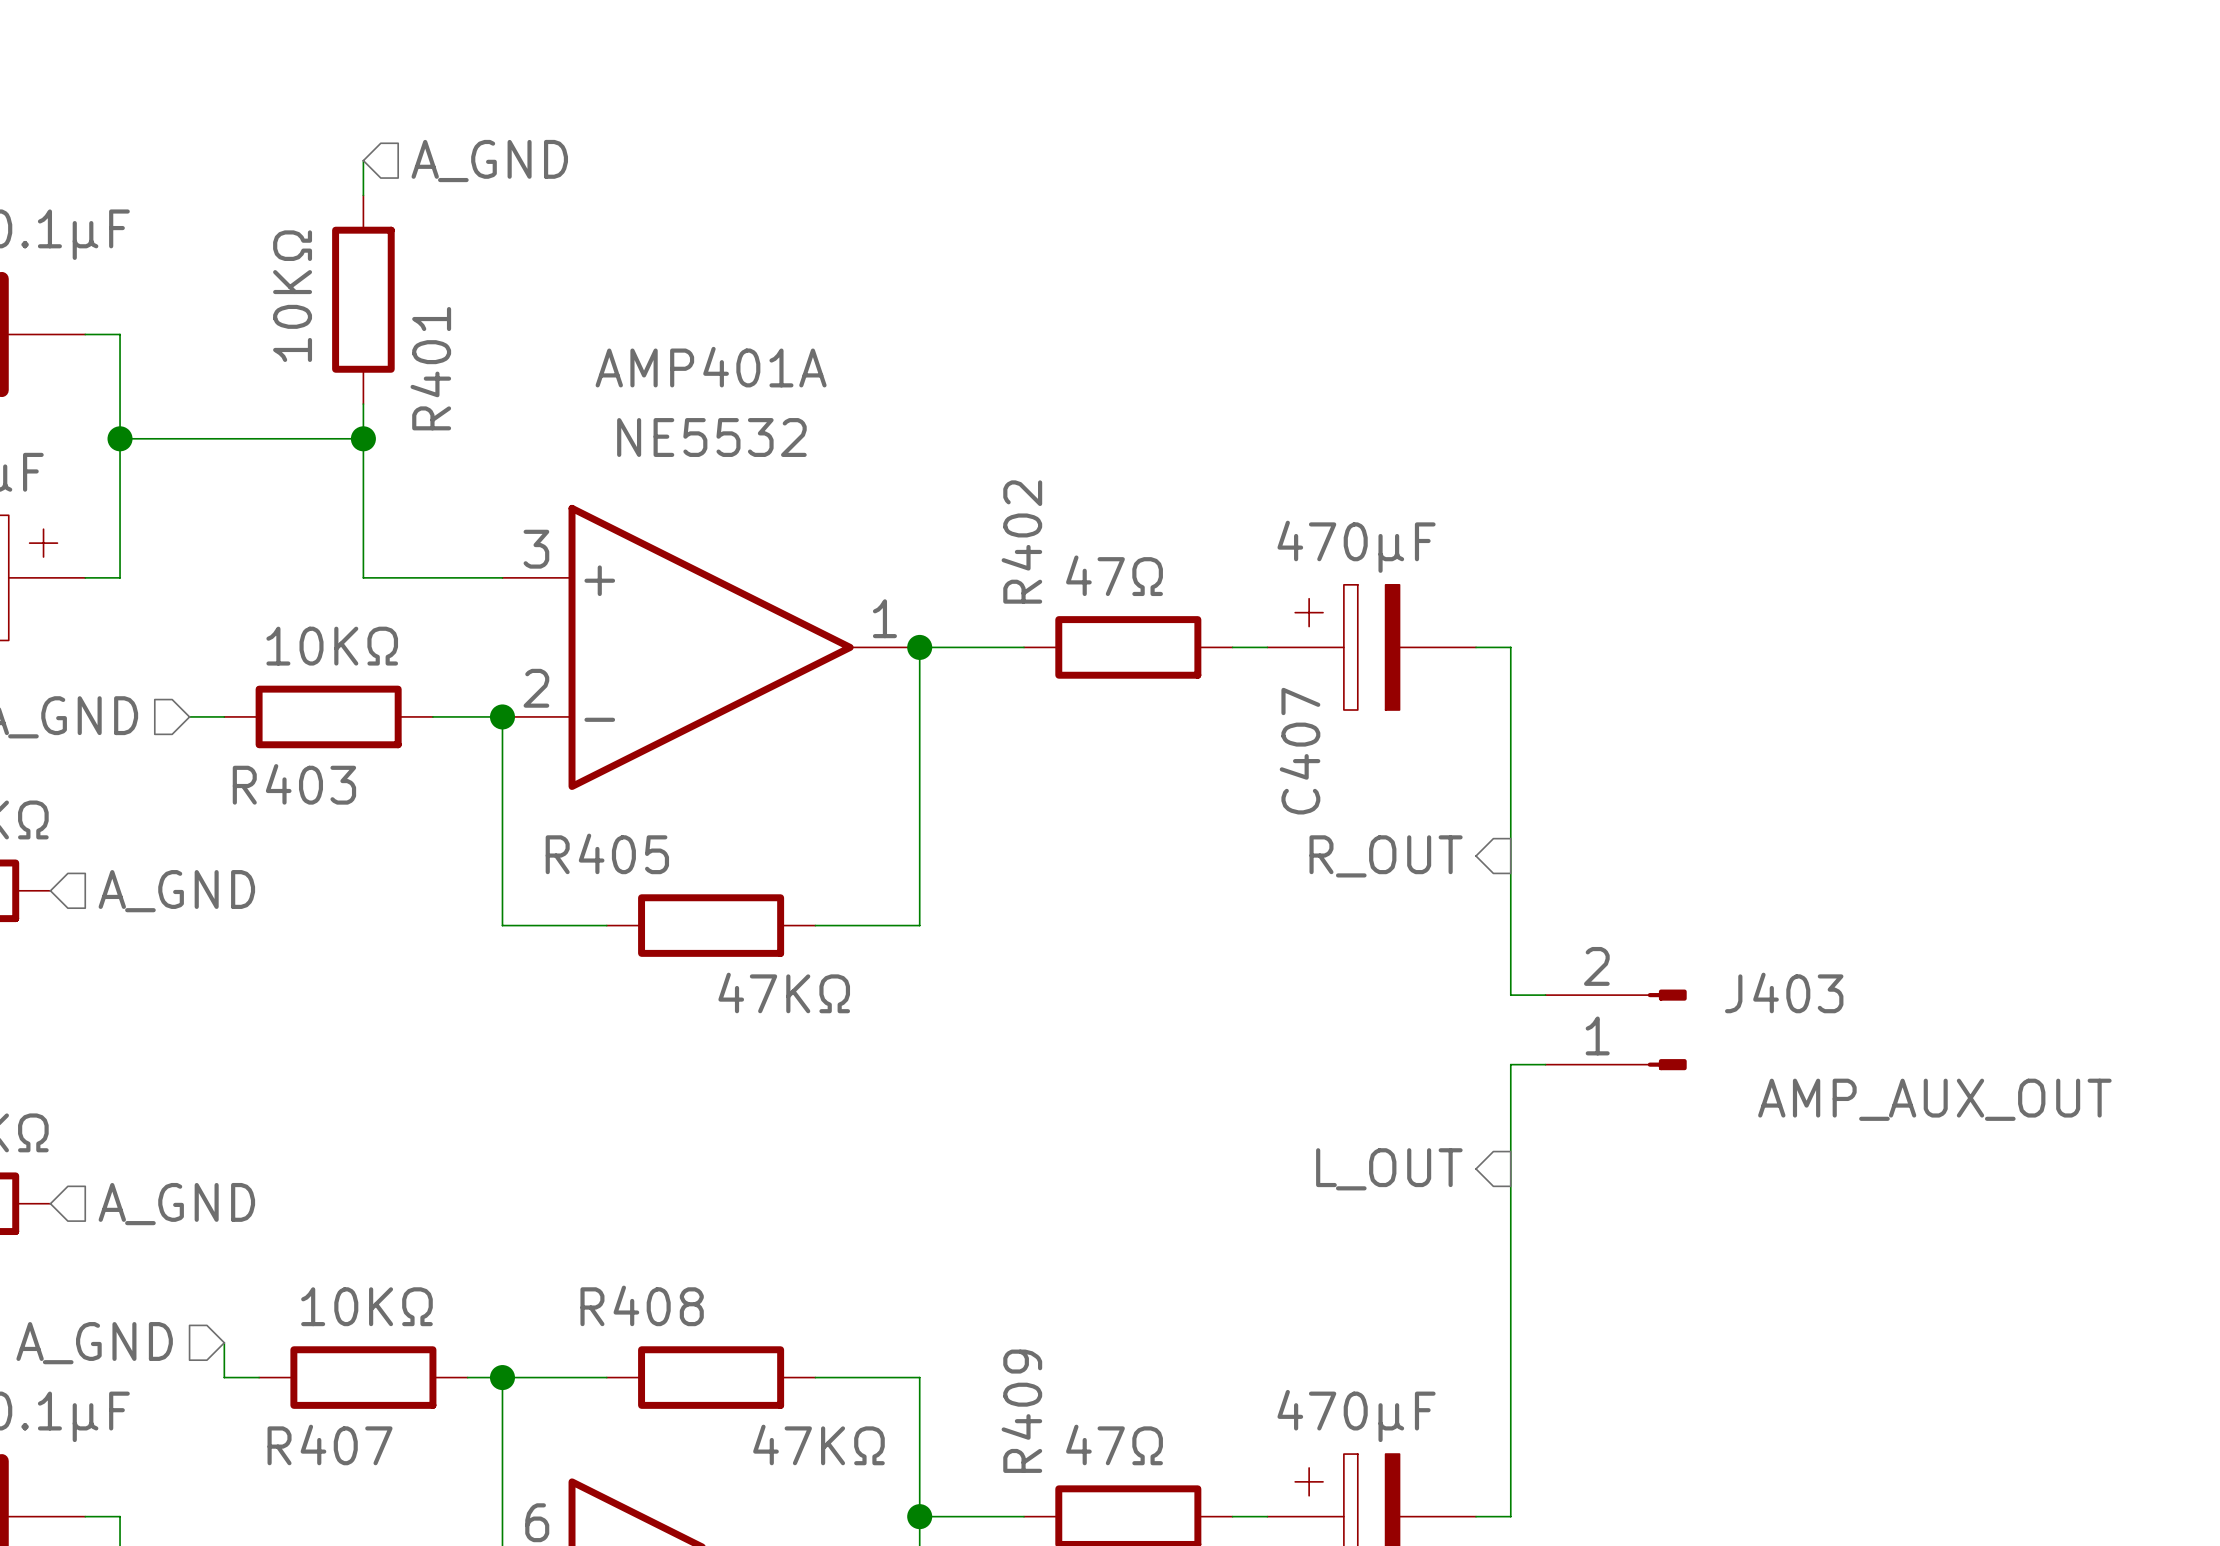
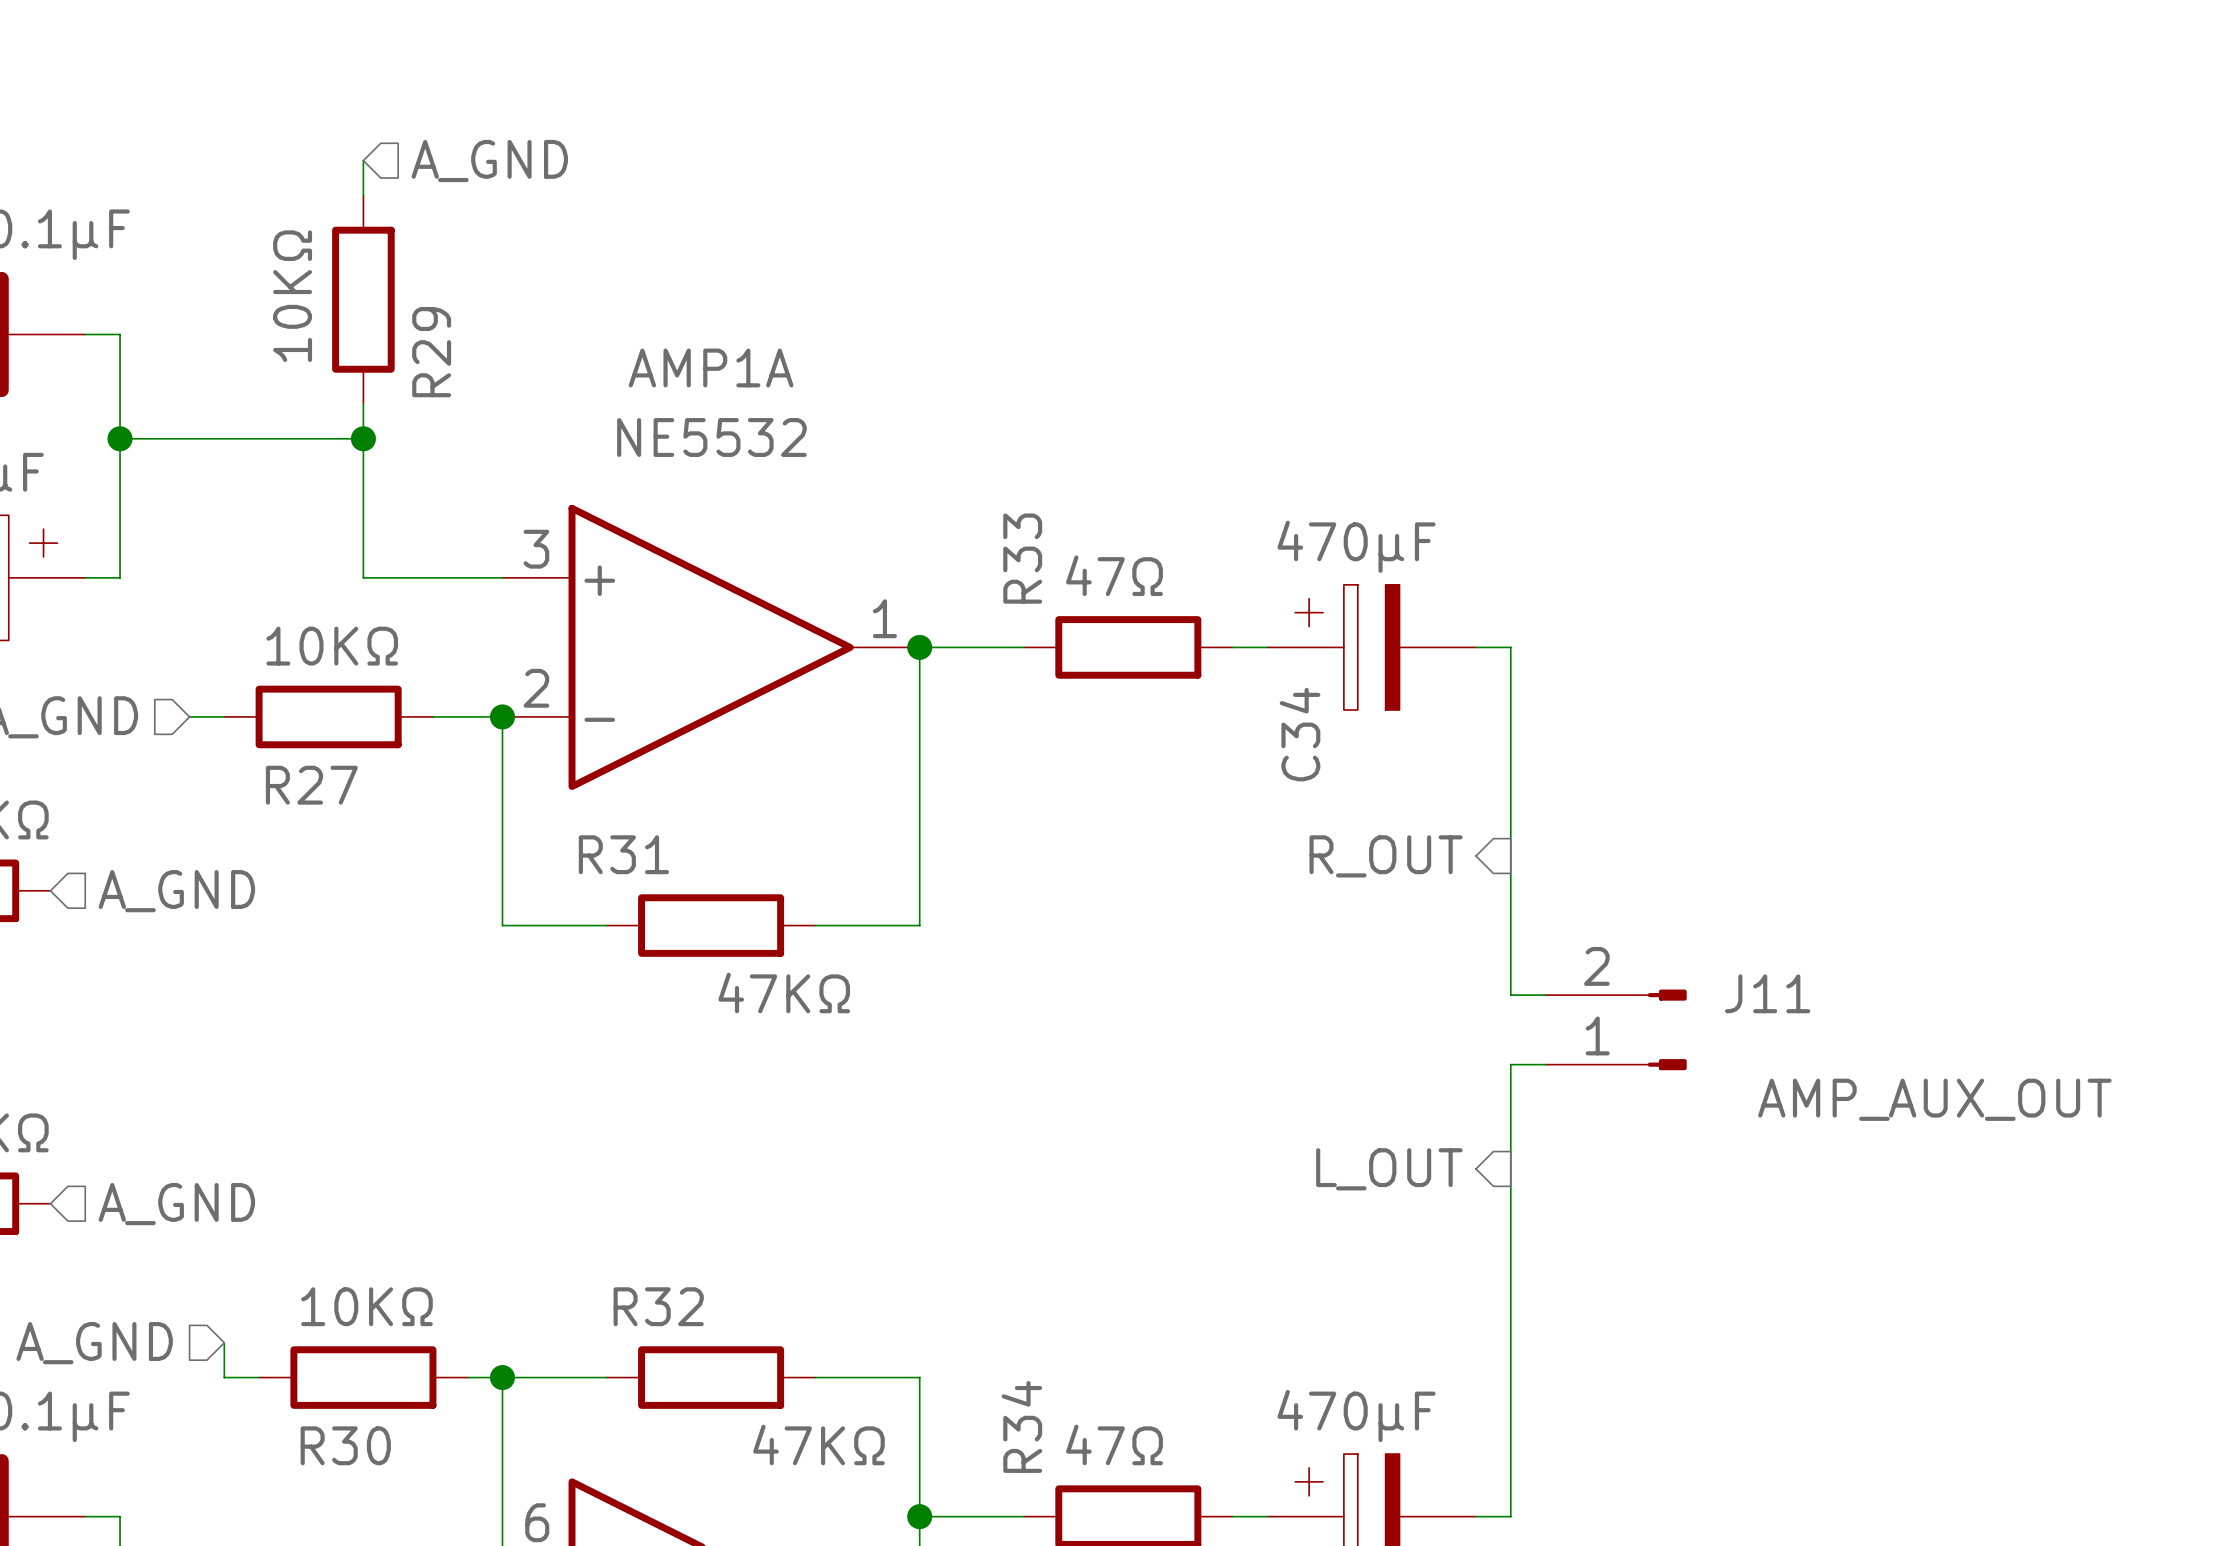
AMP401A name: AMP401A (711, 367) -> AMP1A (711, 367)
R401 name: R401 (430, 368) -> R29 (431, 352)
R402 name: R402 (1021, 542) -> R33 (1022, 558)
C407 name: C407 (1300, 751) -> C34 (1300, 734)
R403 name: R403 (294, 784) -> R27 (311, 785)
R405 name: R405 (607, 853) -> R31 (623, 854)
J403 name: J403 (1784, 992) -> J11 (1767, 993)
R408 name: R408 (642, 1305) -> R32 (658, 1306)
R409 name: R409 (1021, 1411) -> R34 (1021, 1426)
R407 name: R407 (330, 1444) -> R30 (345, 1445)

